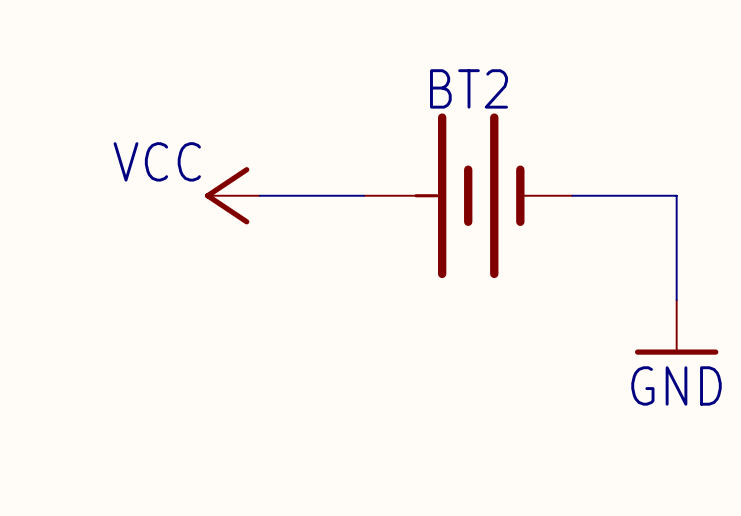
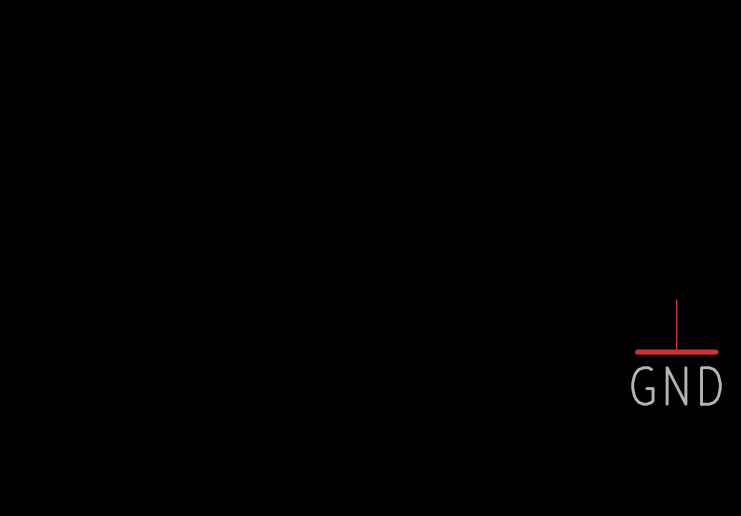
power symbol: VCC (232, 195) -> none
wire: (259, 195) (363, 195) -> none
BT2: (468, 195) -> none
wire: (572, 195) (676, 195) (676, 299) -> none

